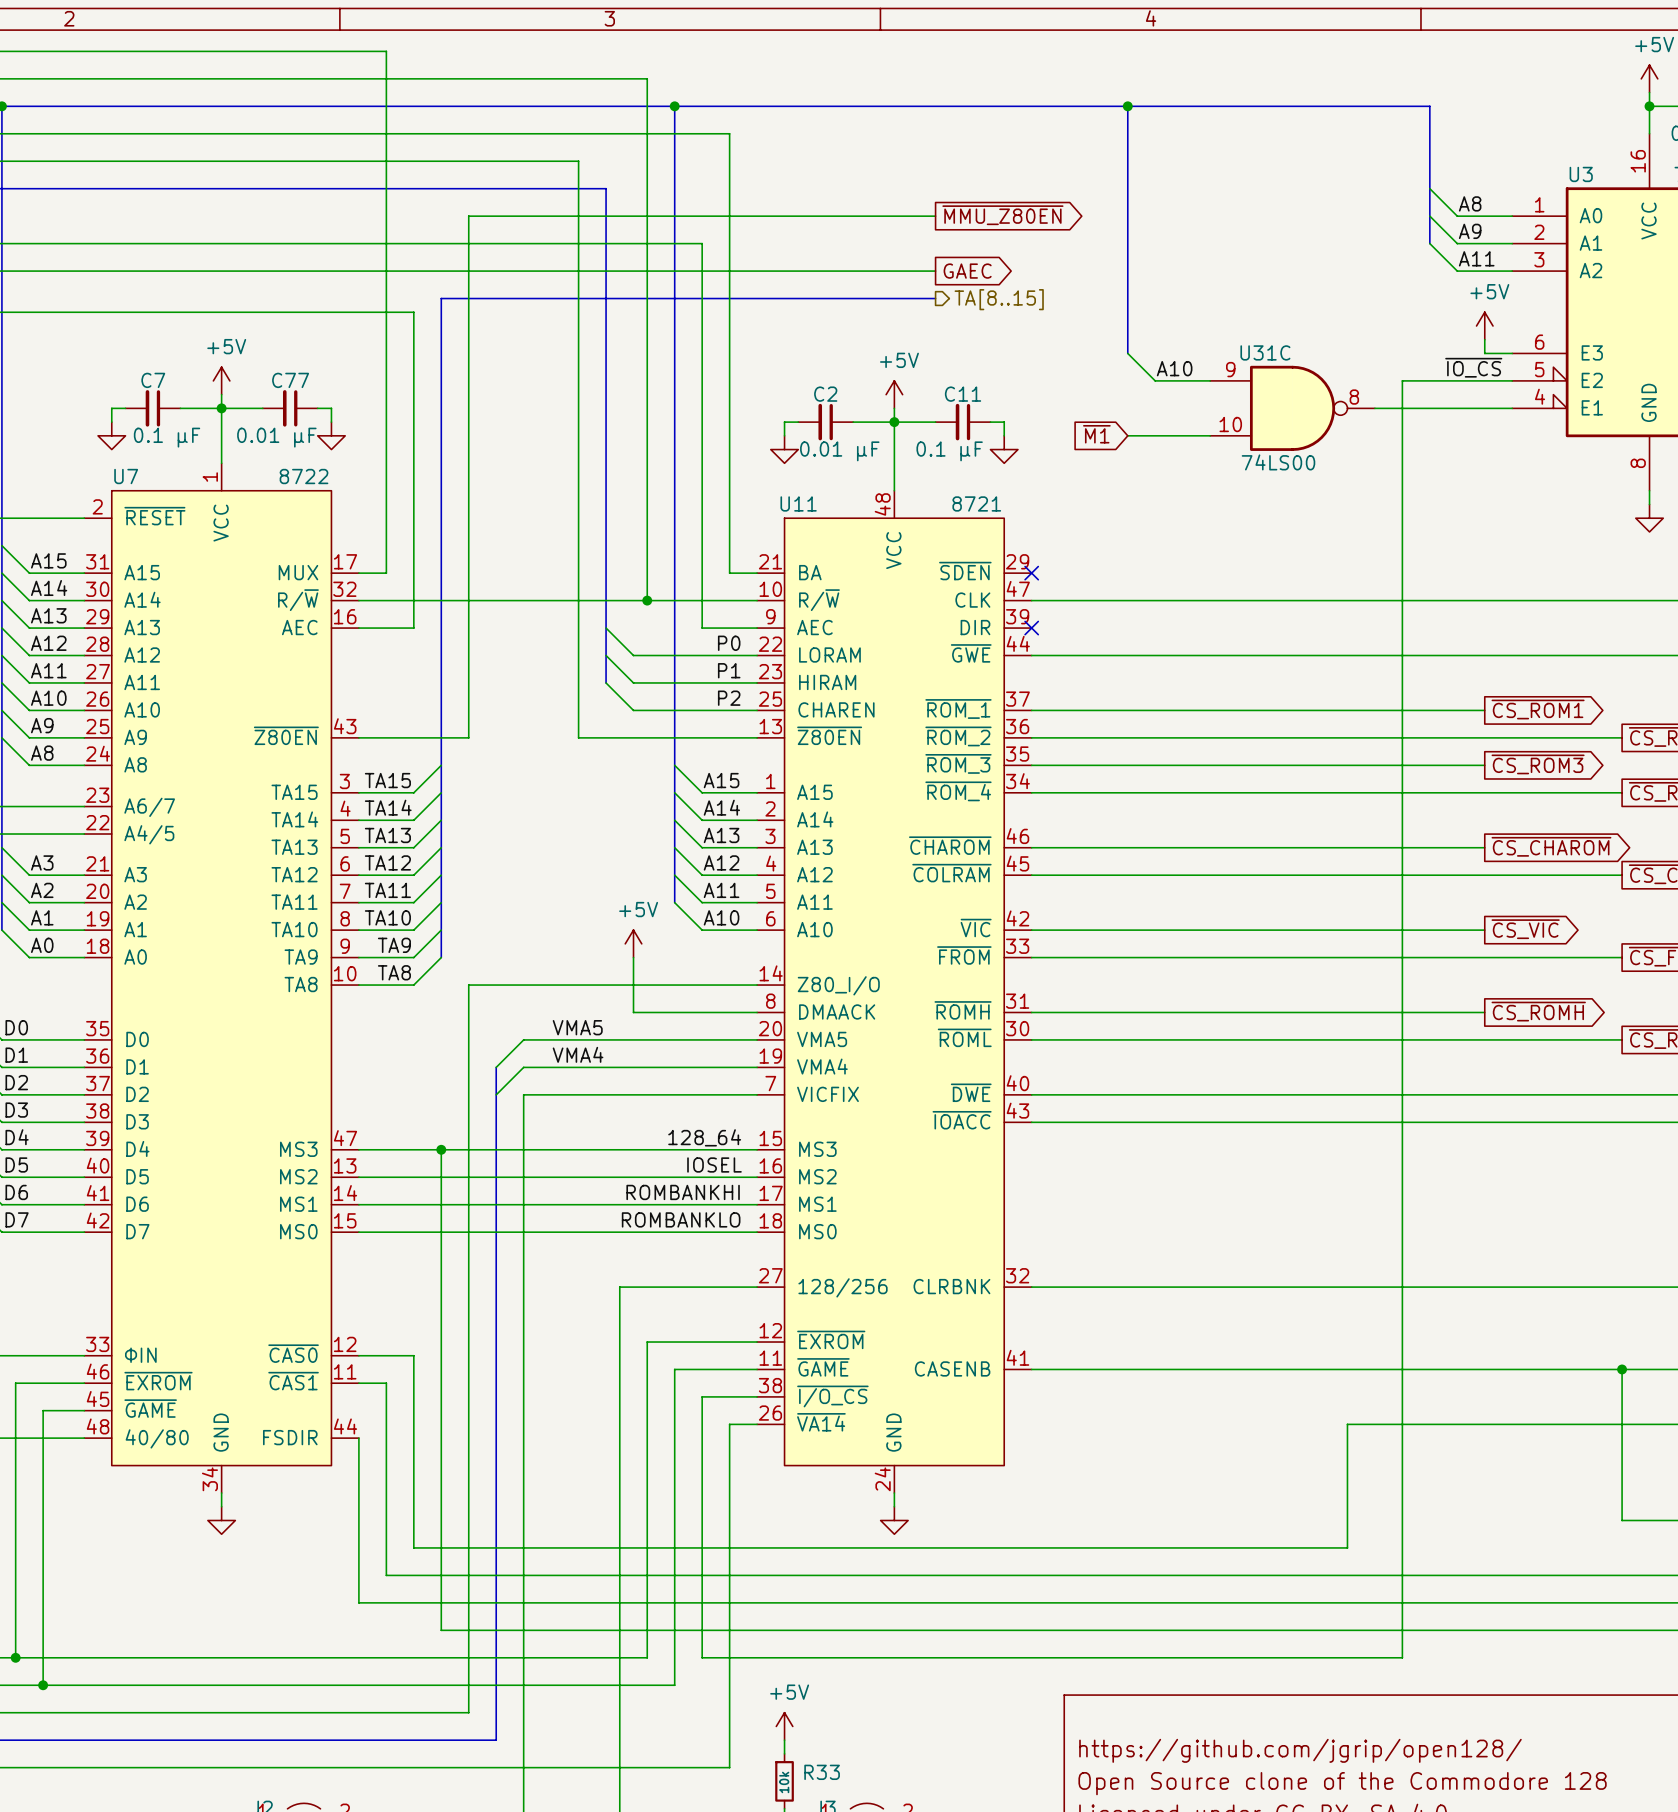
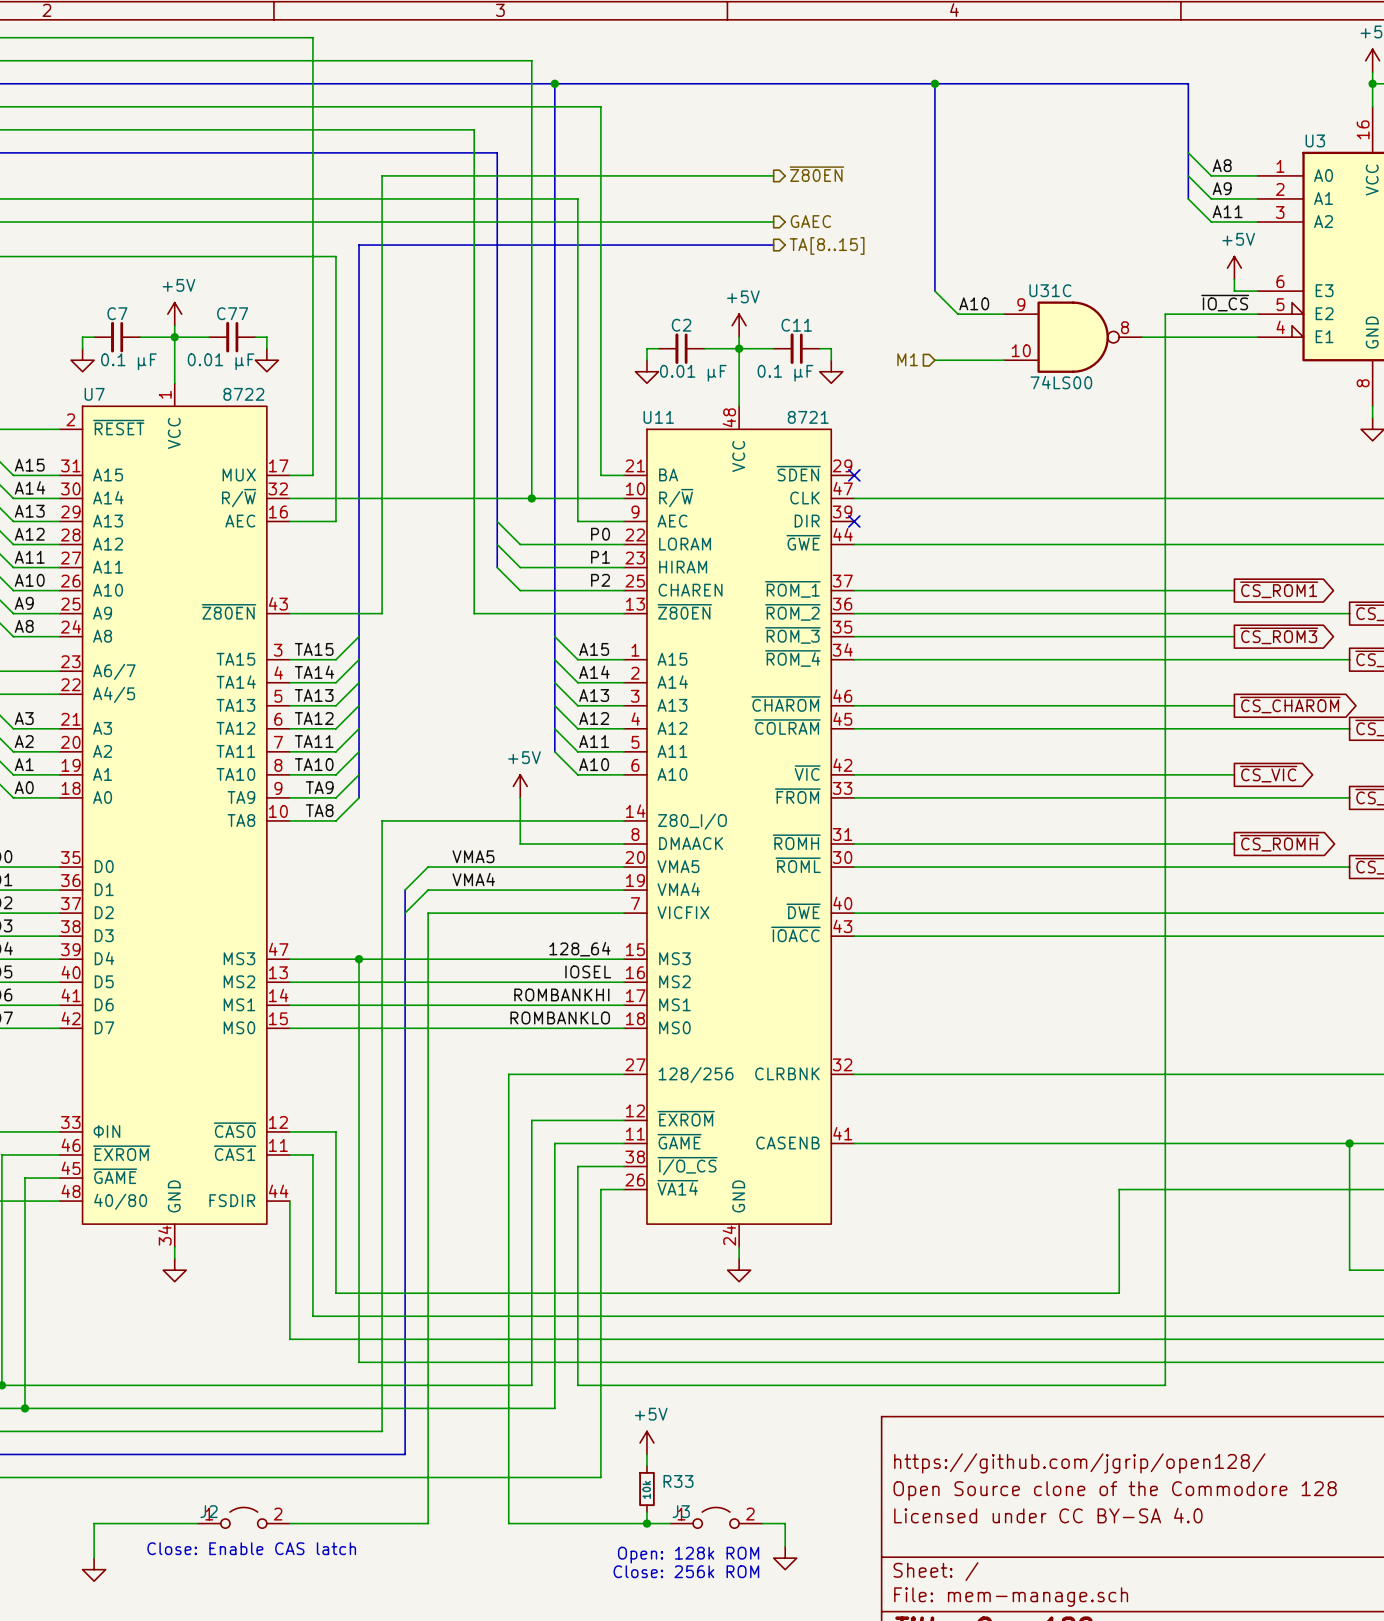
hierarchical label: none -> ~{Z80EN} (816, 174)
global label: ~{MMU_Z80EN} (1002, 215) -> none
hierarchical label: none -> GAEC (810, 221)
global label: GAEC (967, 271) -> none
global label: ~{M1} (1096, 434) -> none
hierarchical label: none -> M1 (907, 359)

